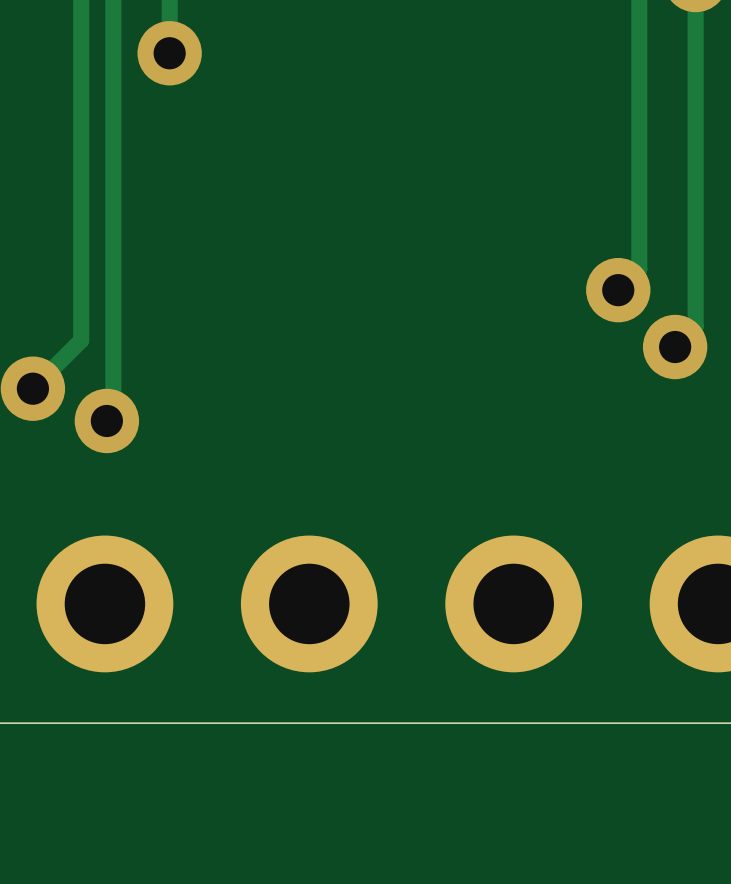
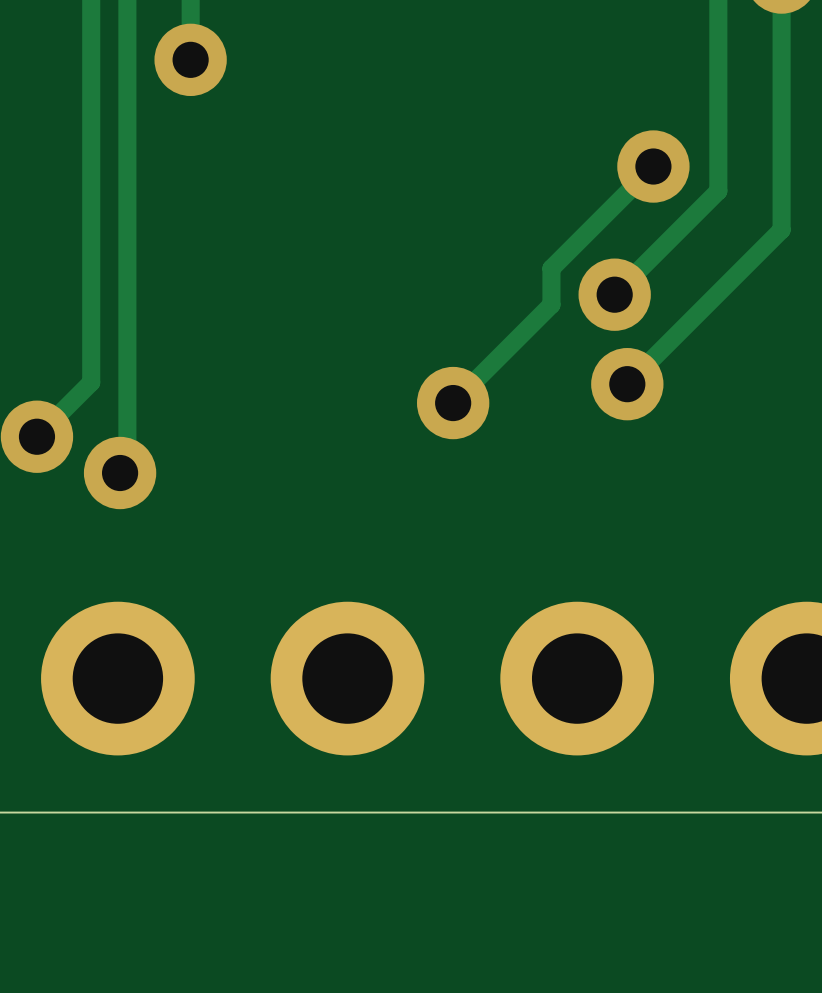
track: none -> (653, 166) (551, 268) (551, 304) (453, 403)
via: none -> (653, 166)
track: (639, 170) (639, 269) (618, 290) -> (718, 191) (614, 294)
track: (695, 204) (695, 326) (675, 347) -> (781, 229) (627, 384)
via: none -> (614, 294)
via position: (618, 290) -> (627, 384)
via: (675, 347) -> none
via: none -> (453, 403)

